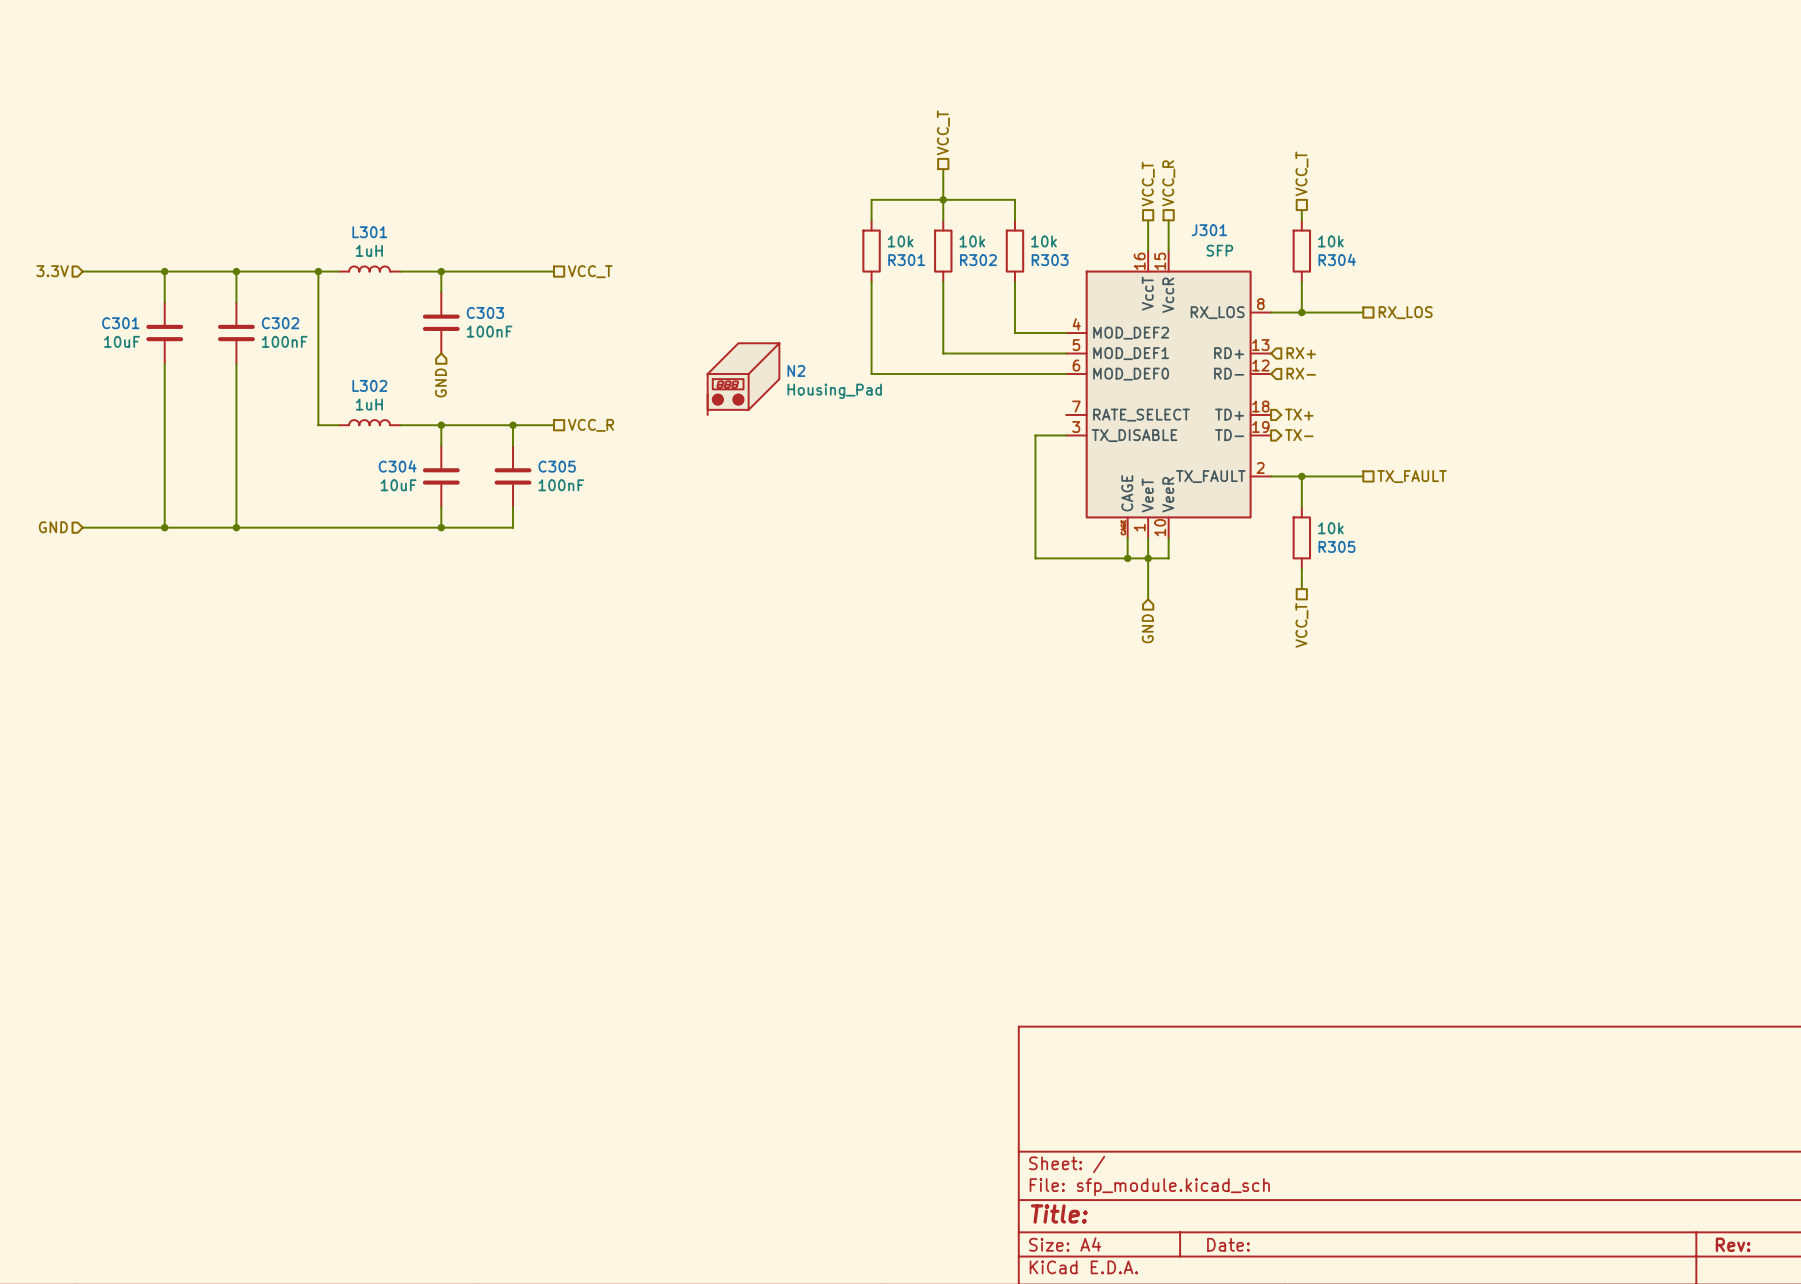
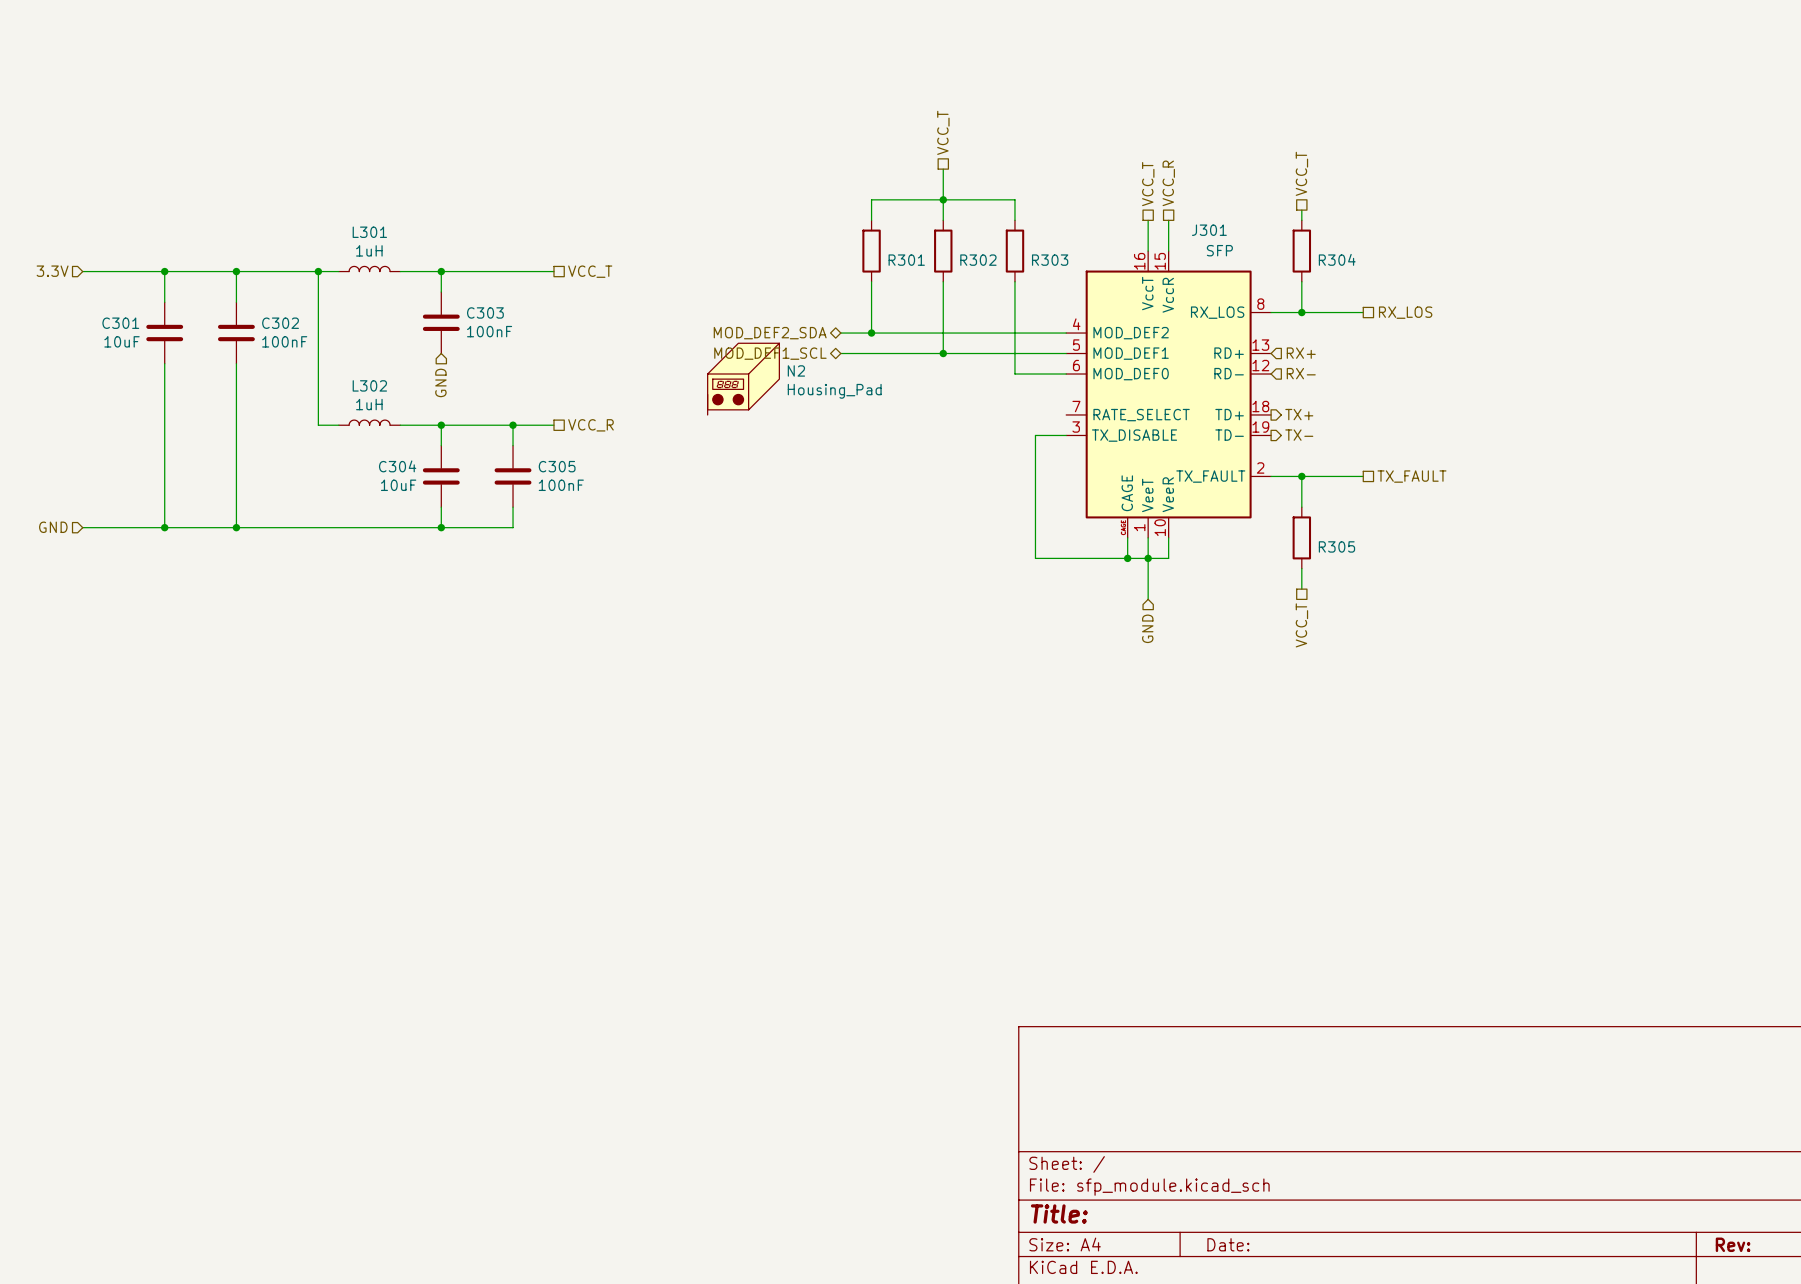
R301 value: 10k (900, 241) -> none
R302 value: 10k (972, 241) -> none
R303 value: 10k (1044, 241) -> none
R304 value: 10k (1330, 241) -> none
hierarchical label: none -> MOD_DEF2_SDA (770, 333)
wire: (871, 333) (871, 374) (1014, 374) -> (840, 333) (1014, 333) (1014, 374)
junction: none -> (871, 333)
hierarchical label: none -> MOD_DEF1_SCL (770, 353)
wire: none -> (840, 353) (943, 353)
junction: none -> (943, 353)
R305 value: 10k (1330, 528) -> none

